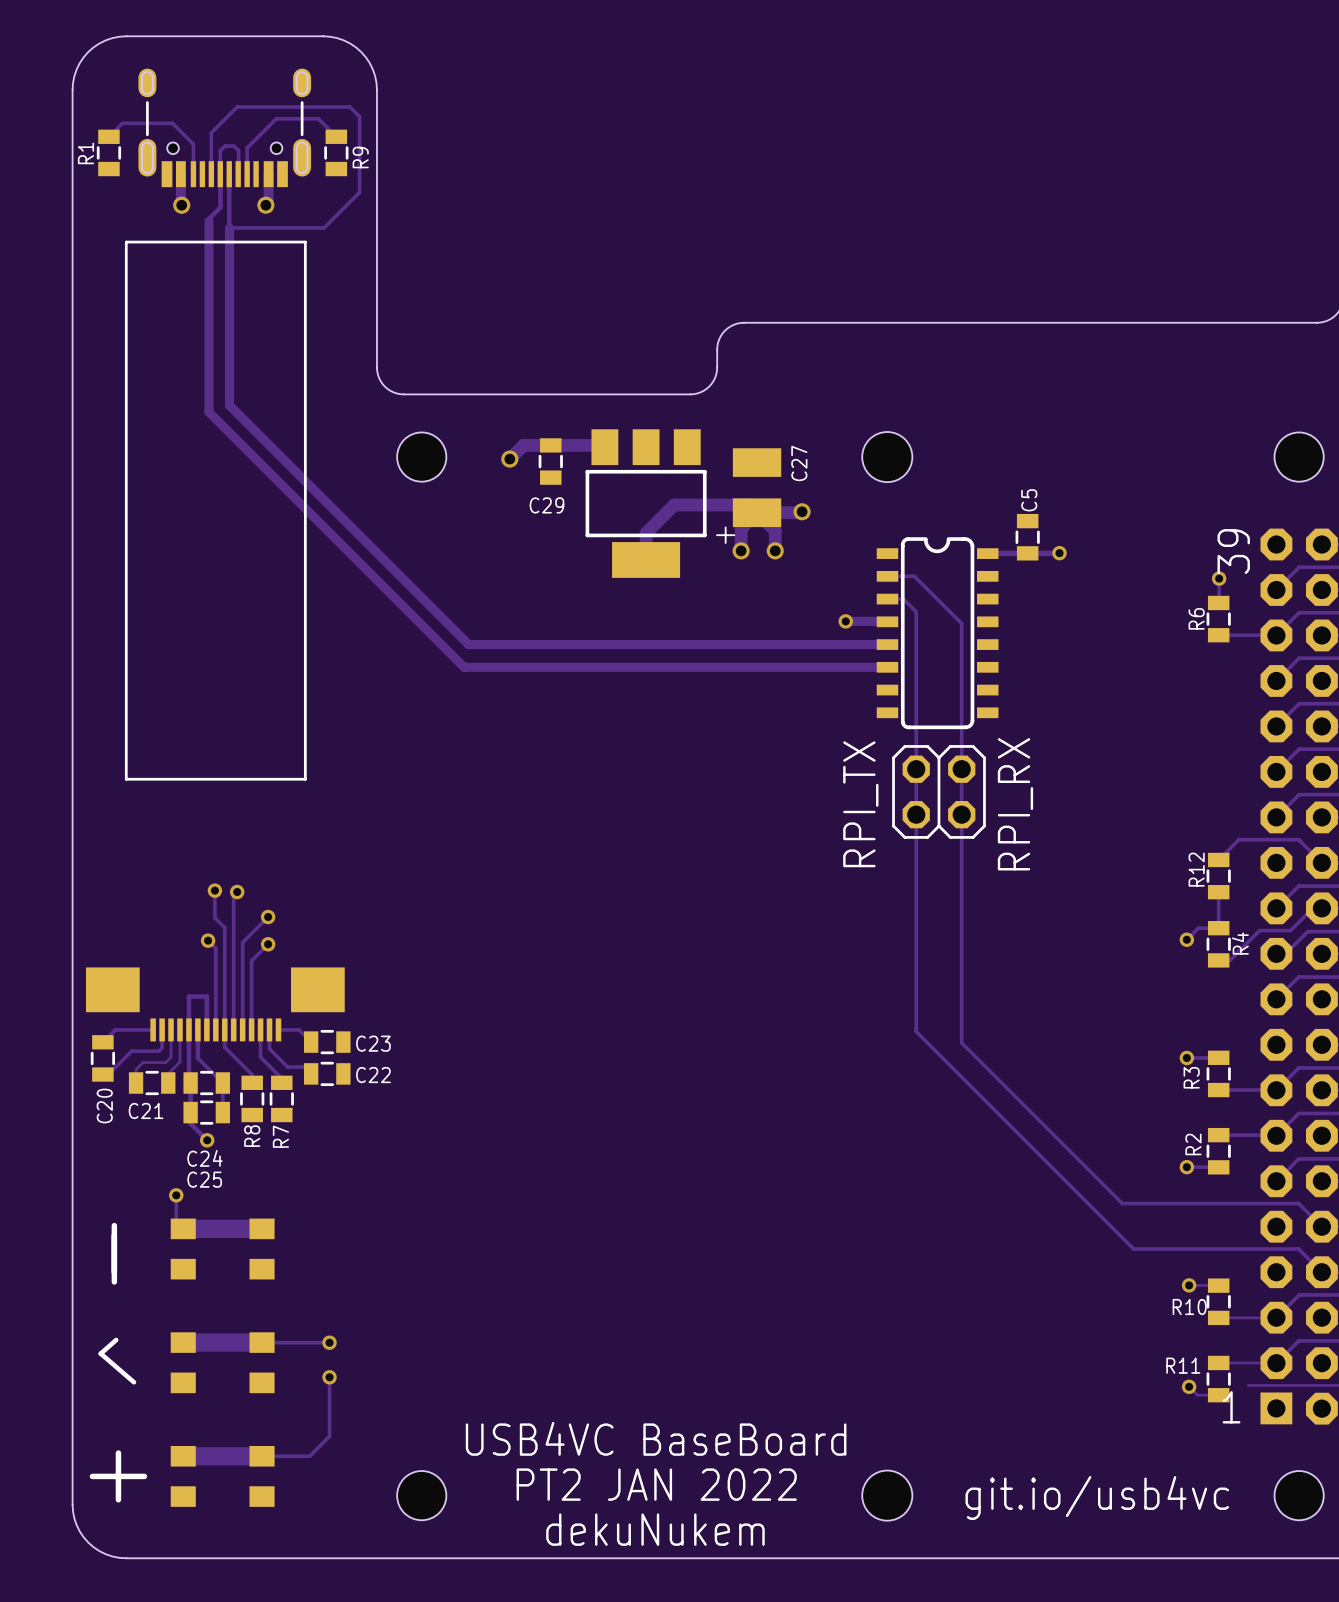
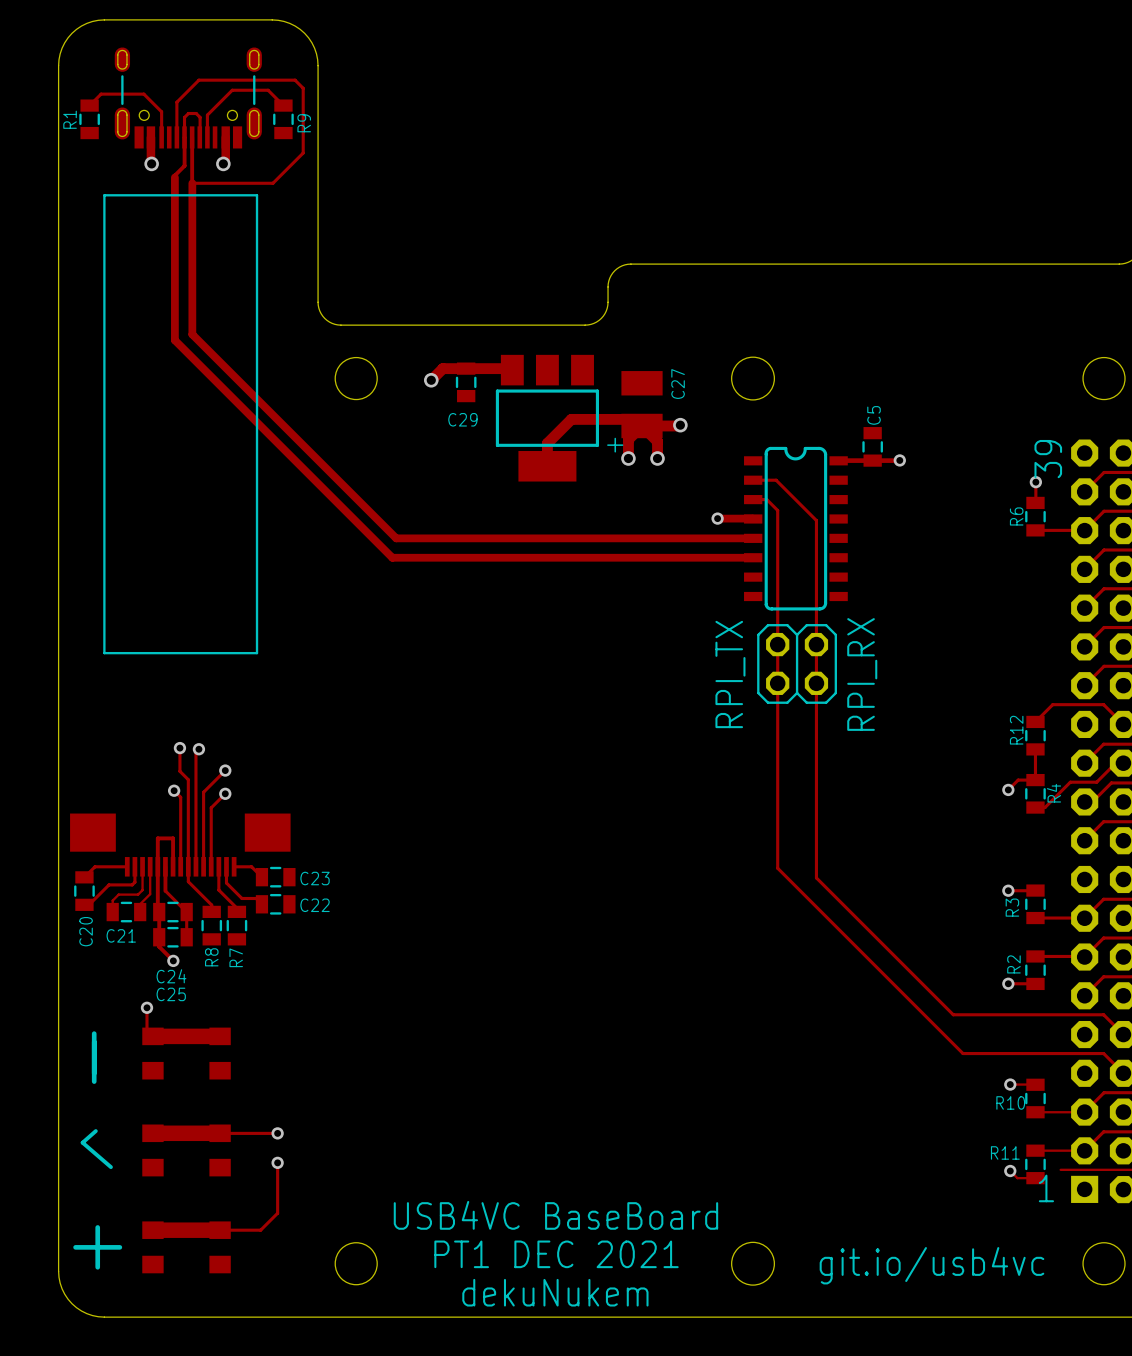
text: PT2 JAN 2022 (656, 1484) -> PT1 DEC 2021 (556, 1254)

